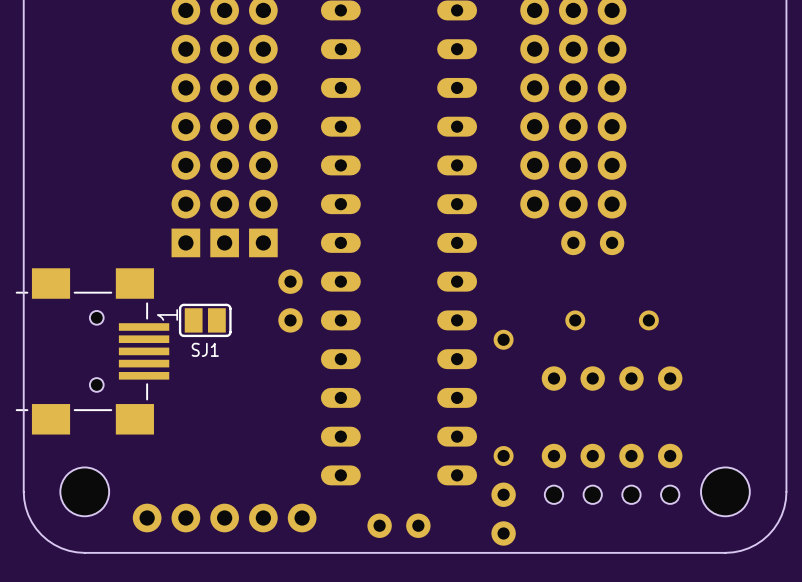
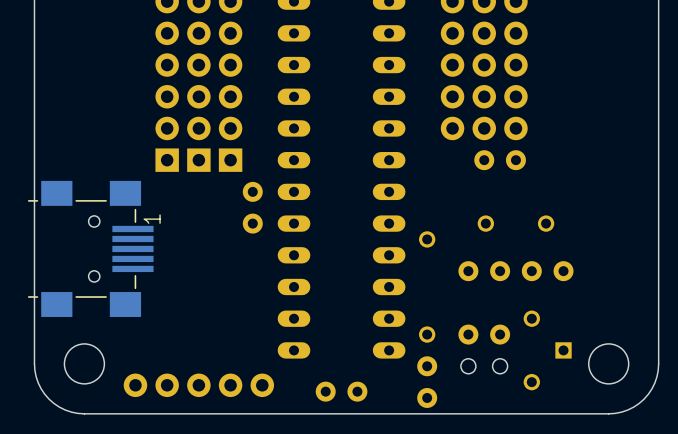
SJ1: (205, 320) -> none
part: (650, 456) -> none
part: none -> (547, 350)
hole: (631, 494) -> none
hole: (670, 494) -> none

